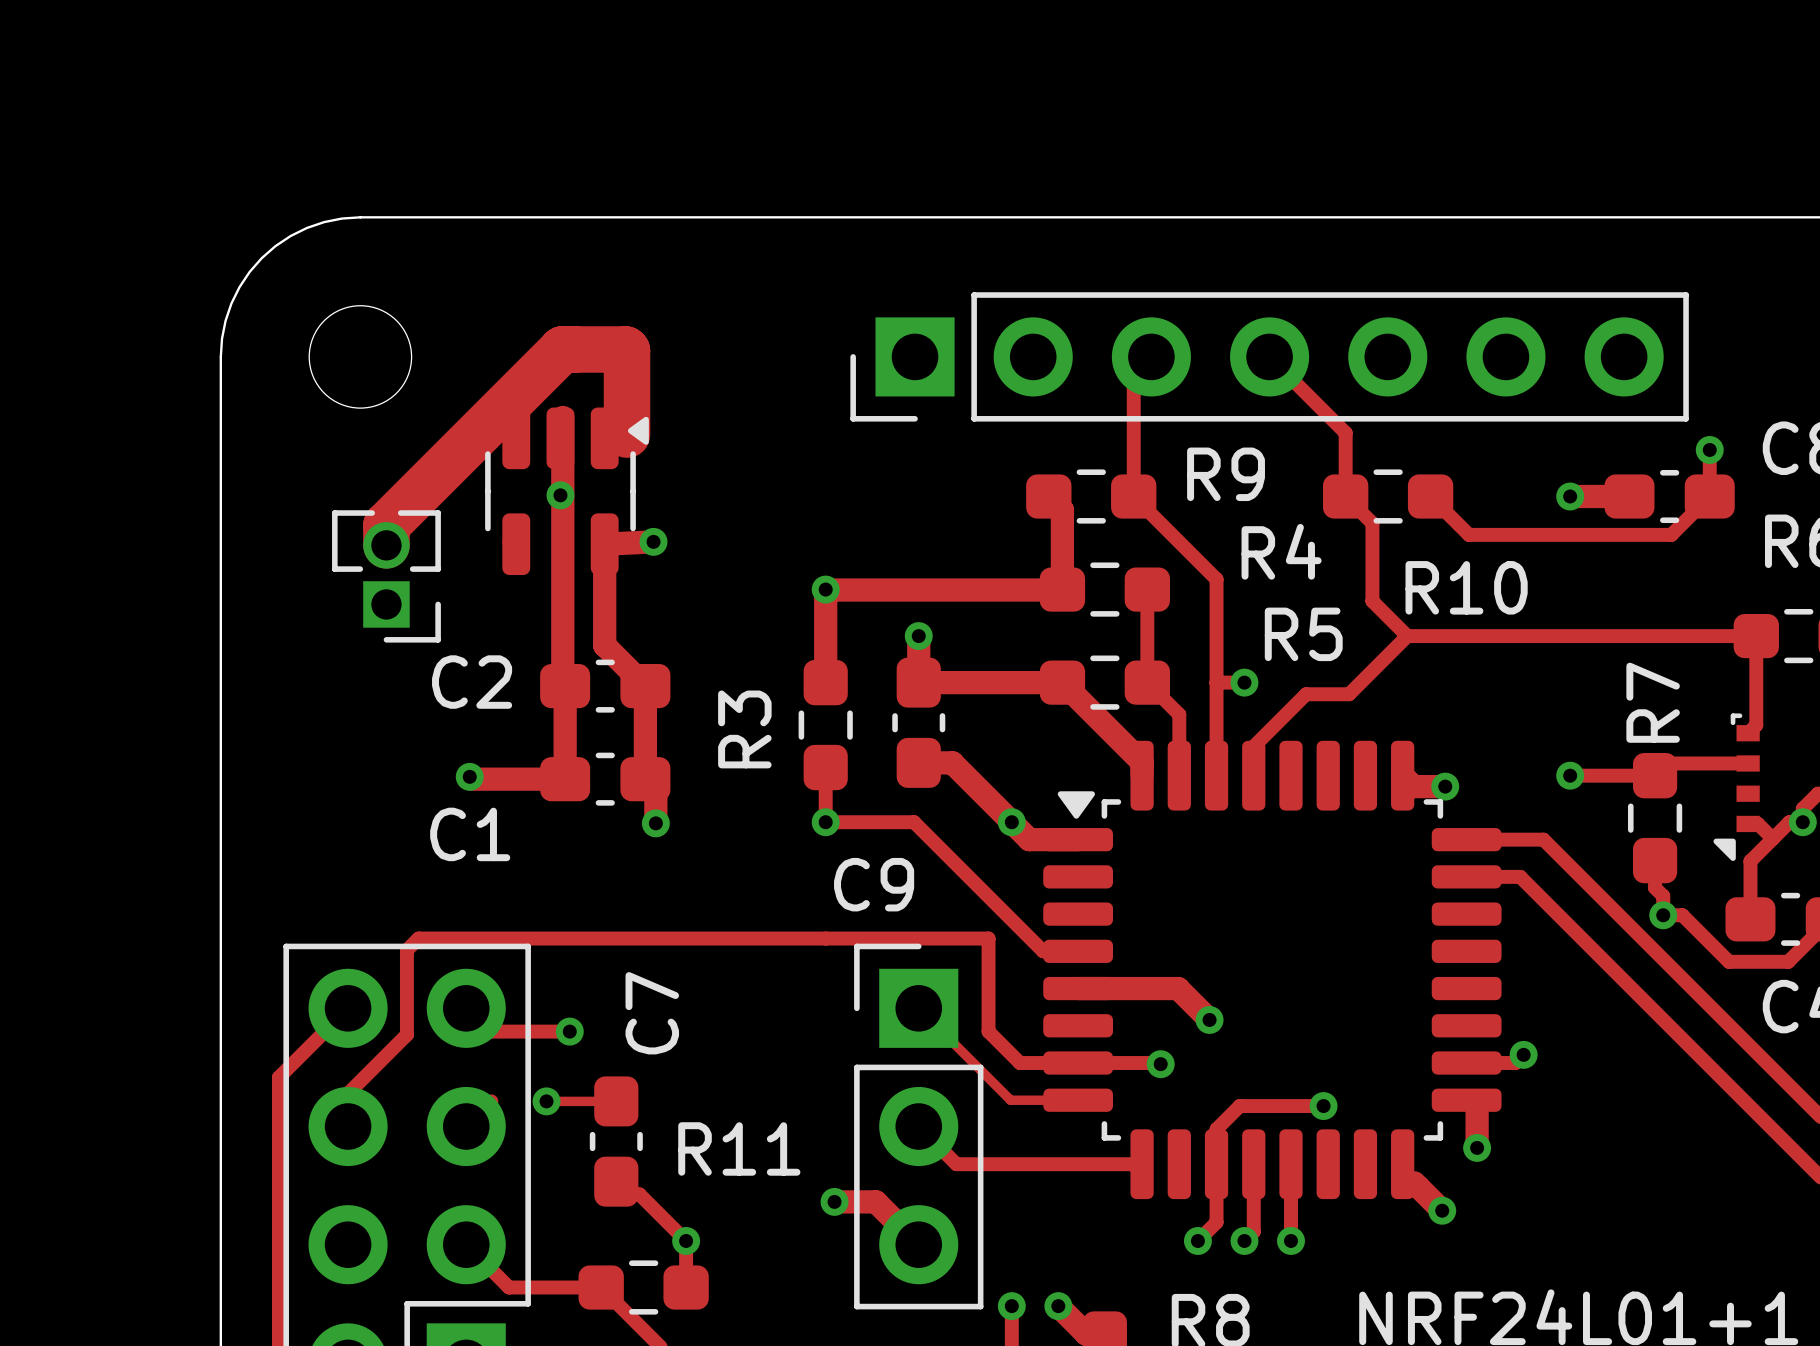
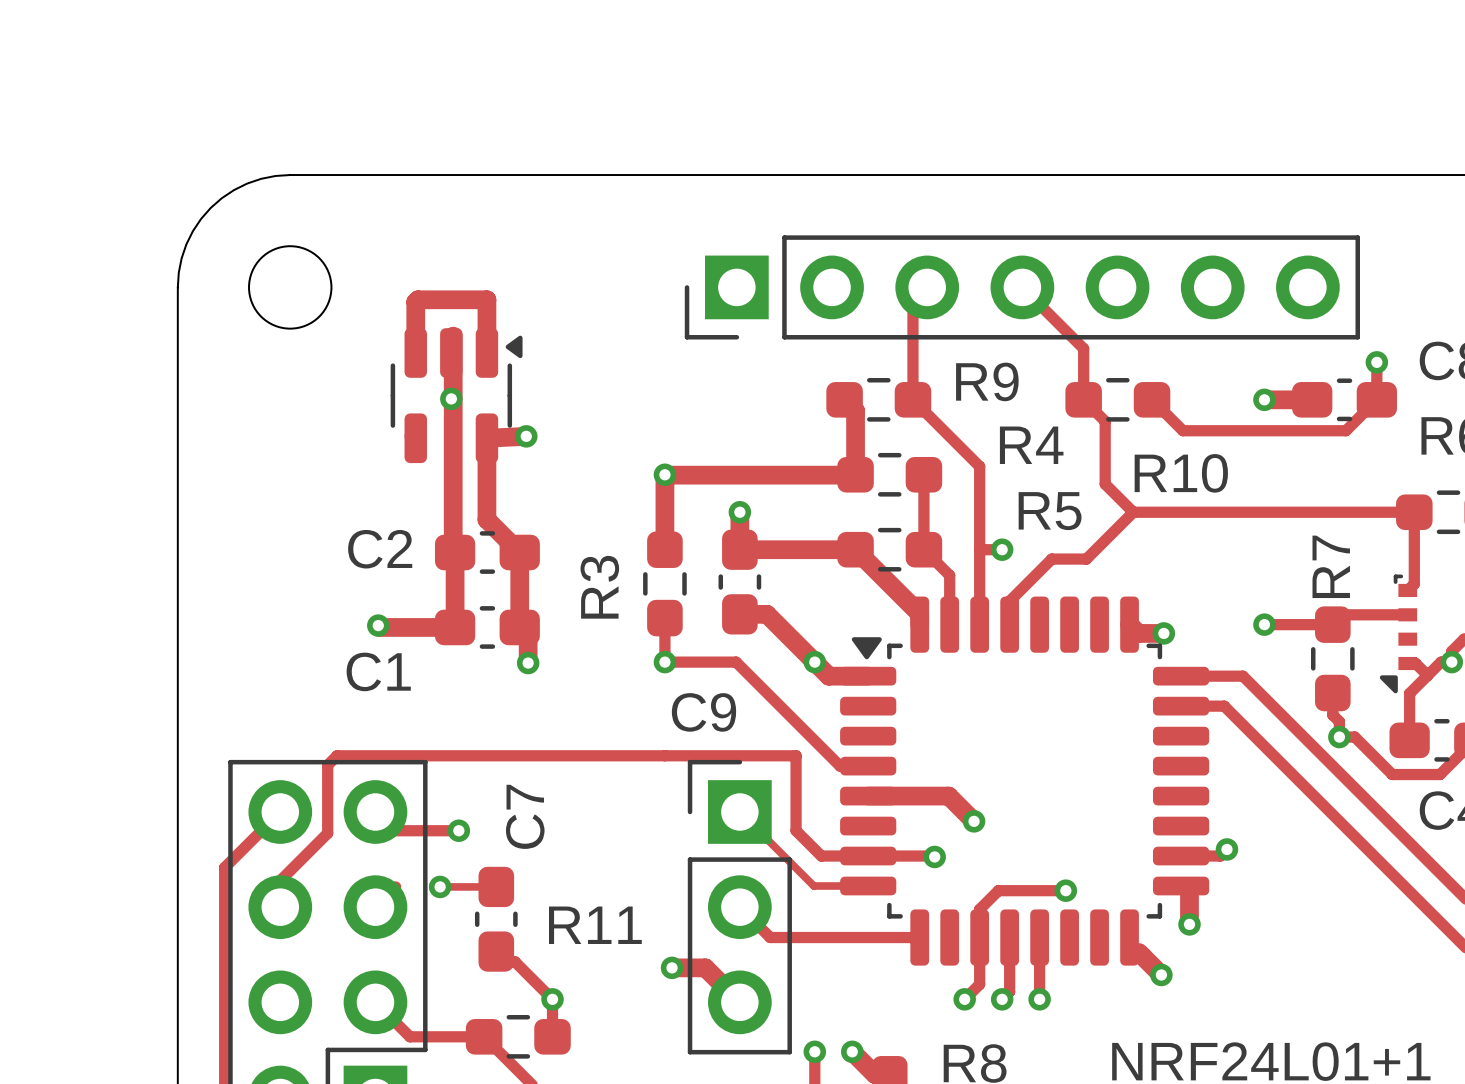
track: (627, 434) (627, 350) (562, 349) (386, 525) (386, 545) -> none
track: none -> (415, 352) (415, 302) (418, 299) (486, 299) (486, 352)
part: (386, 576) -> none

